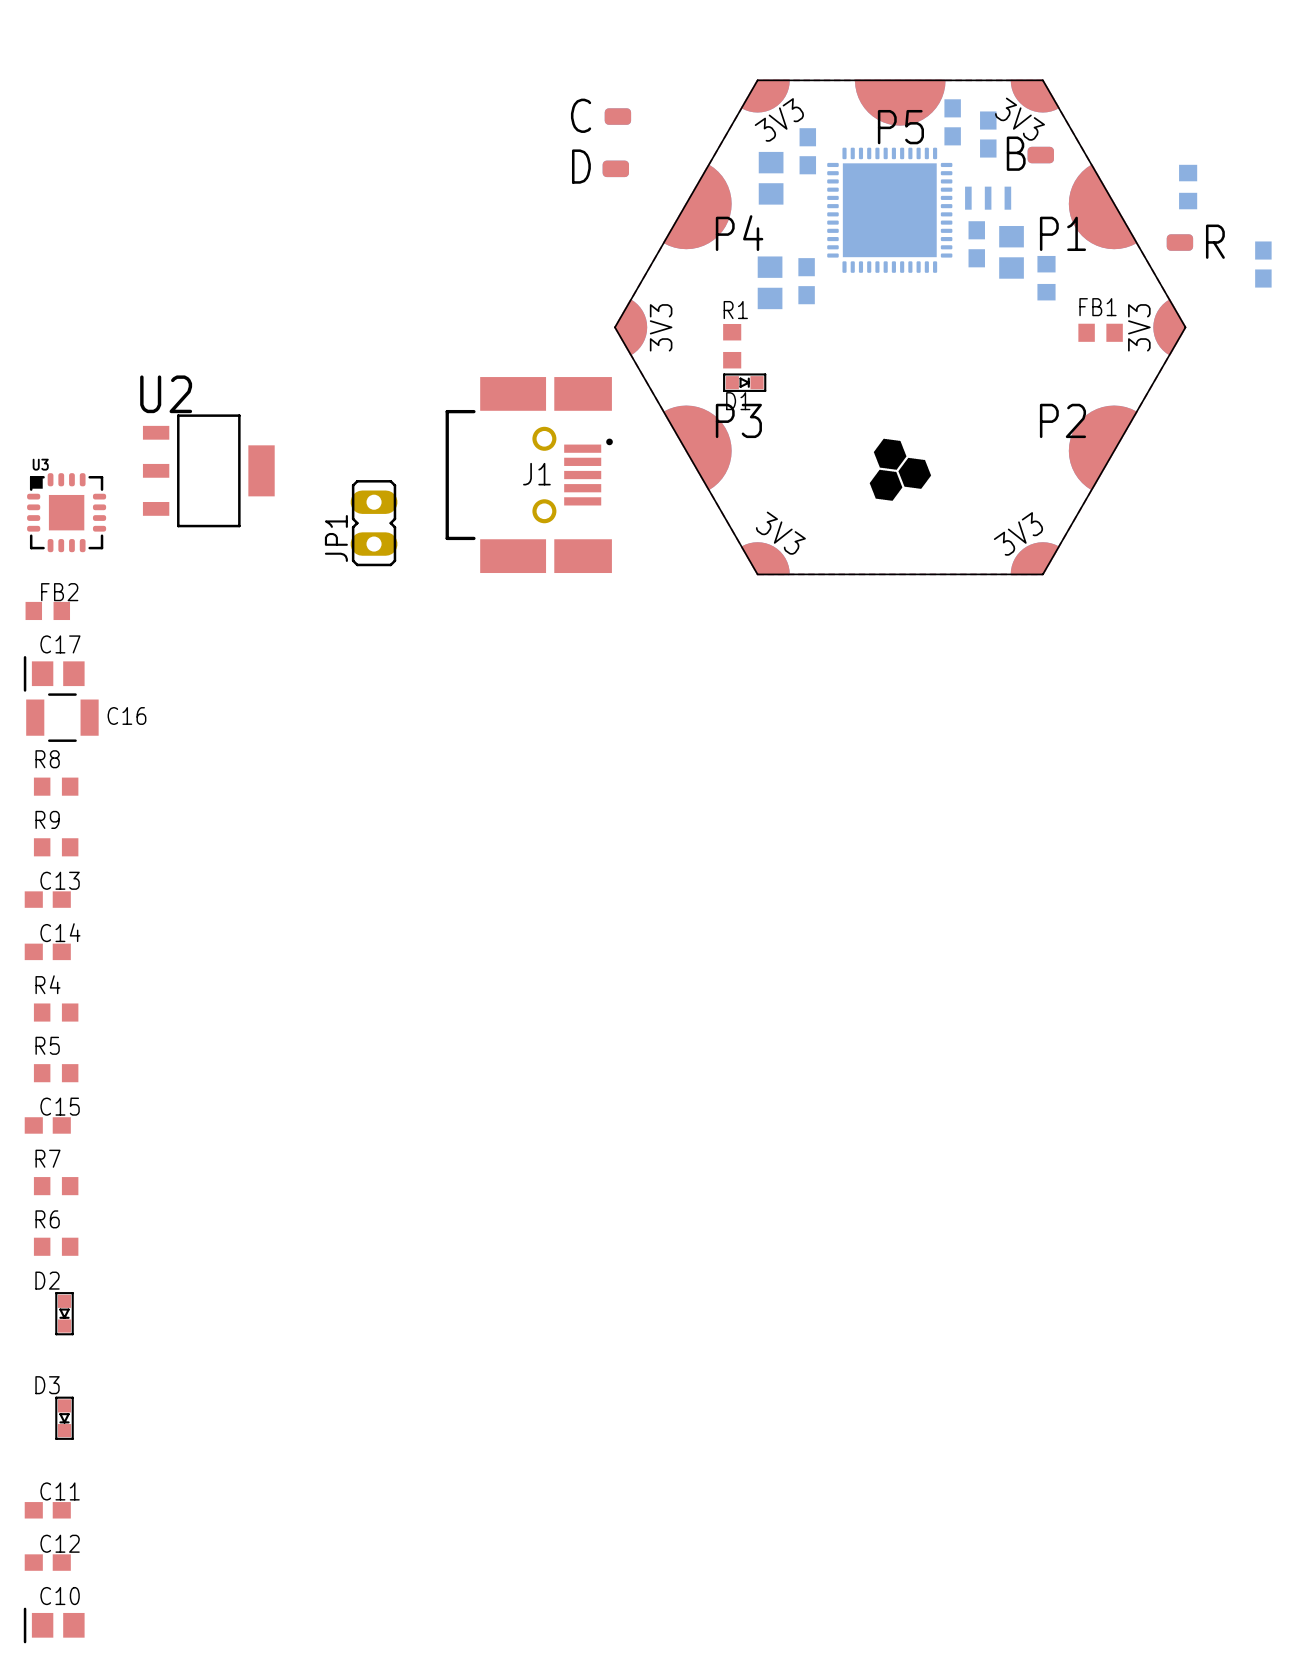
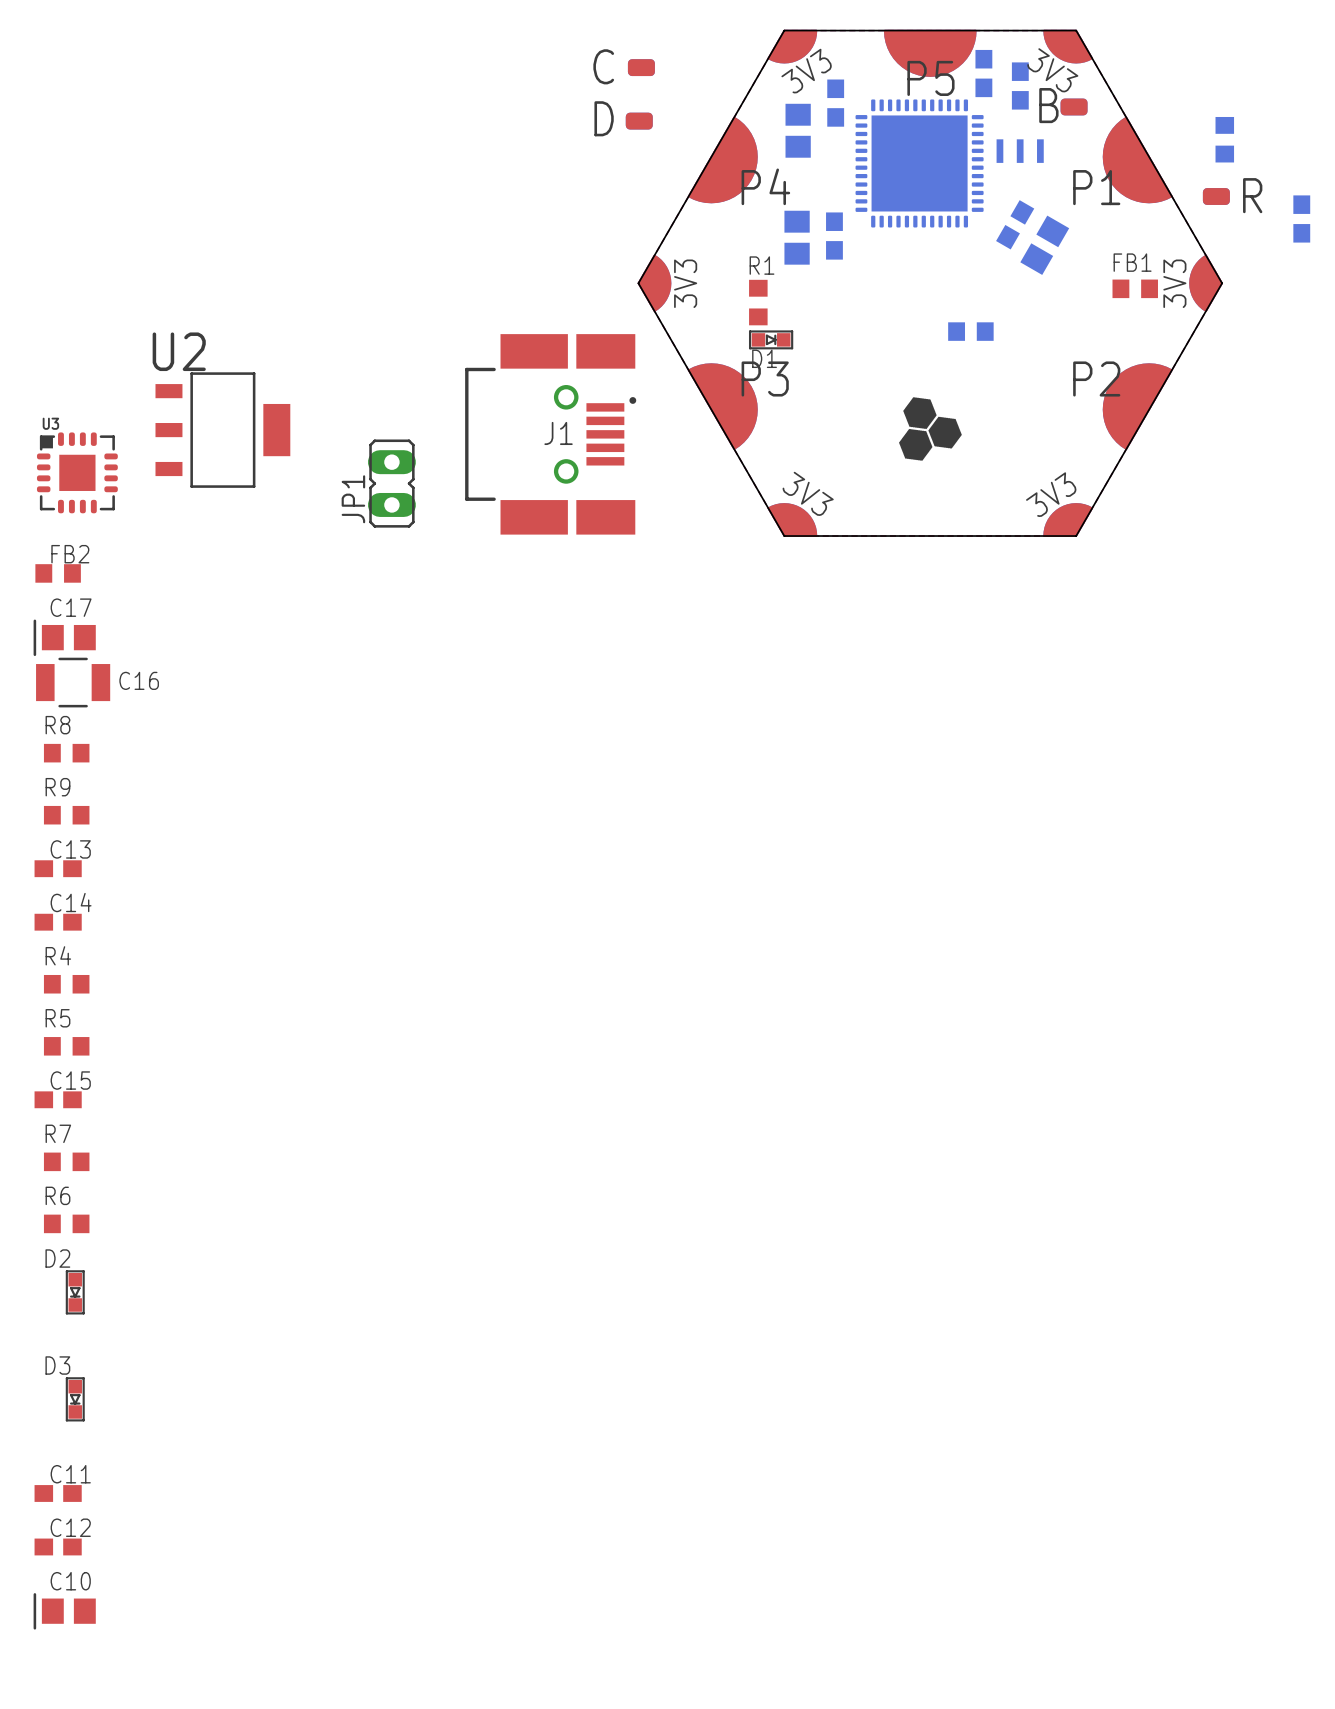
part: (976, 244) -> none
part: (1011, 252) -> none
part: none -> (1015, 224)
part rotation: 0° (1046, 278) -> 90° clockwise (970, 331)
part position: (1046, 278) -> (970, 331)
part: none -> (1044, 245)

